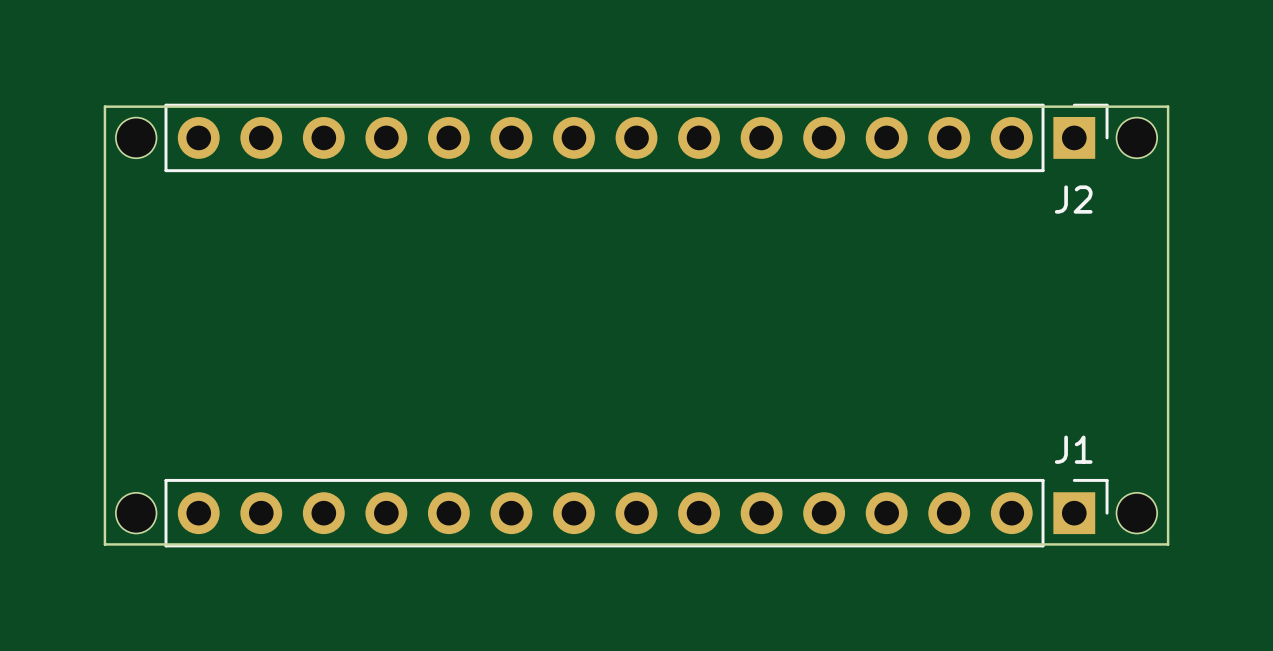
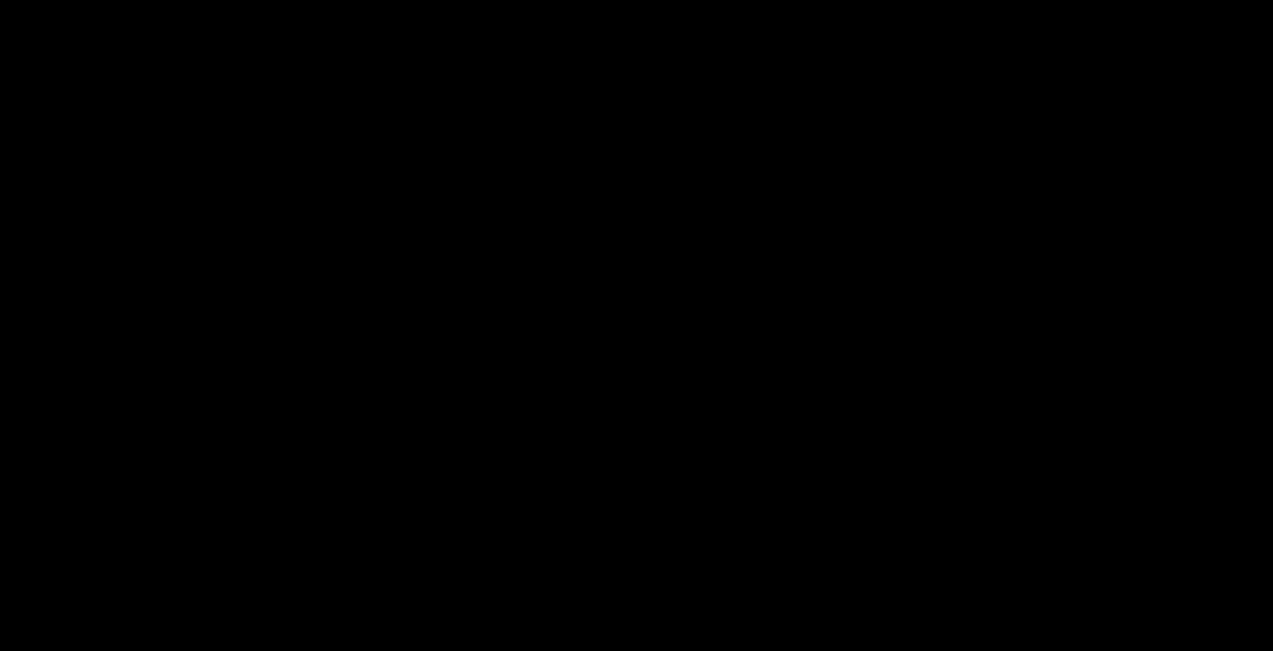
board edge: (1168, 106) (104, 106) (104, 544) (1168, 544) (1168, 106) -> none
part: (136, 137) -> none
J2: (636, 137) -> none
part: (1136, 137) -> none
part: (136, 513) -> none
J1: (636, 513) -> none
part: (1136, 513) -> none

